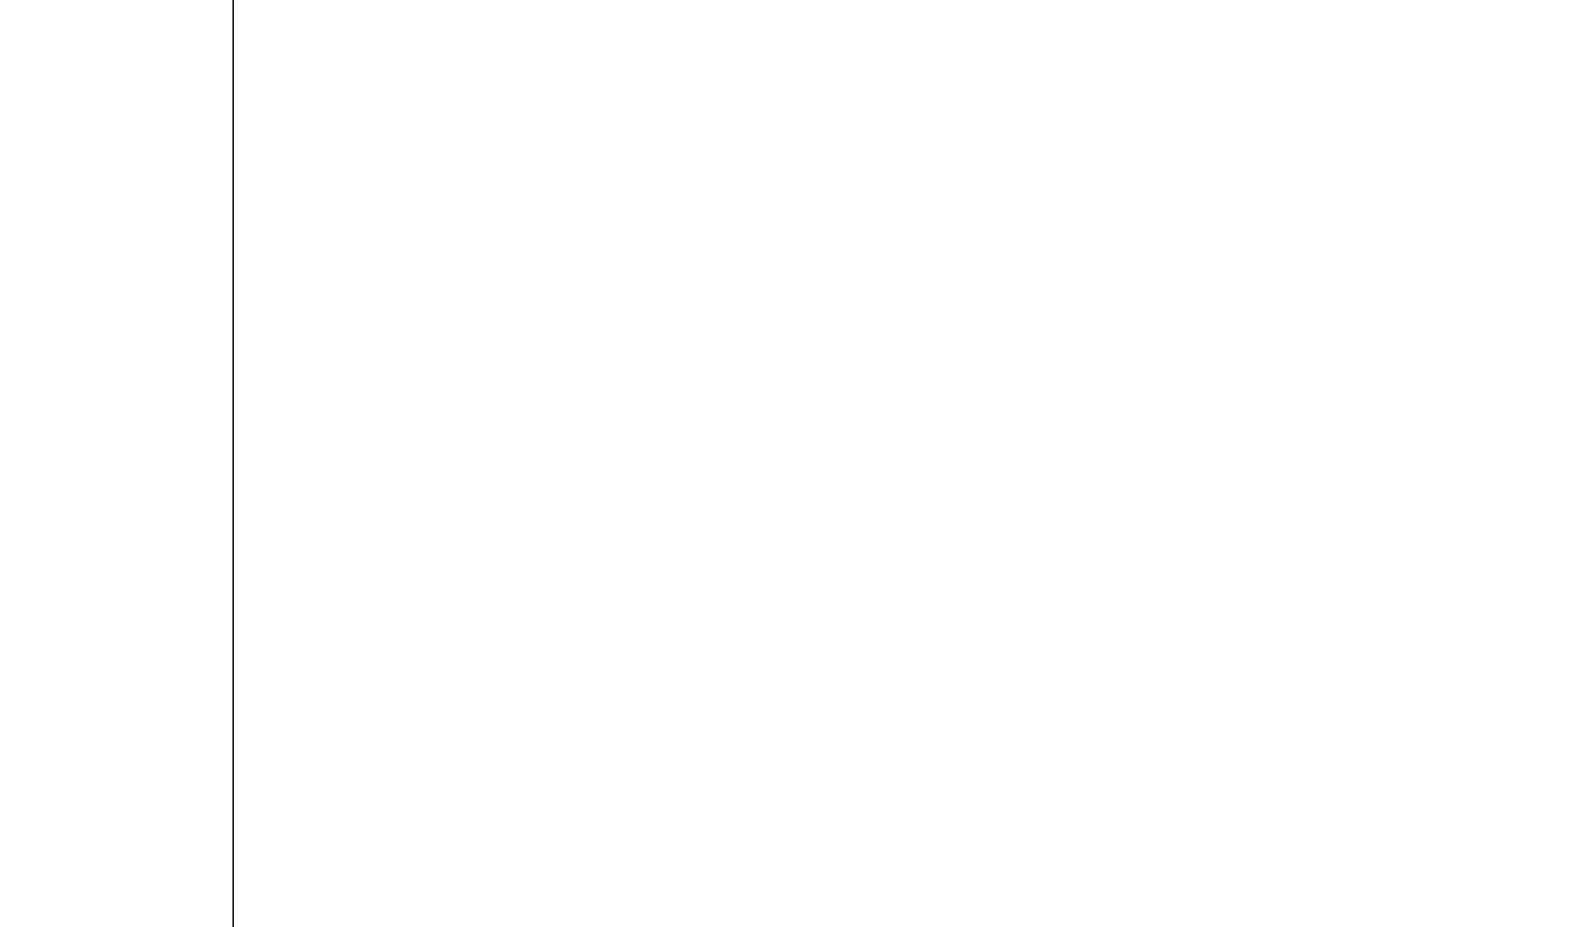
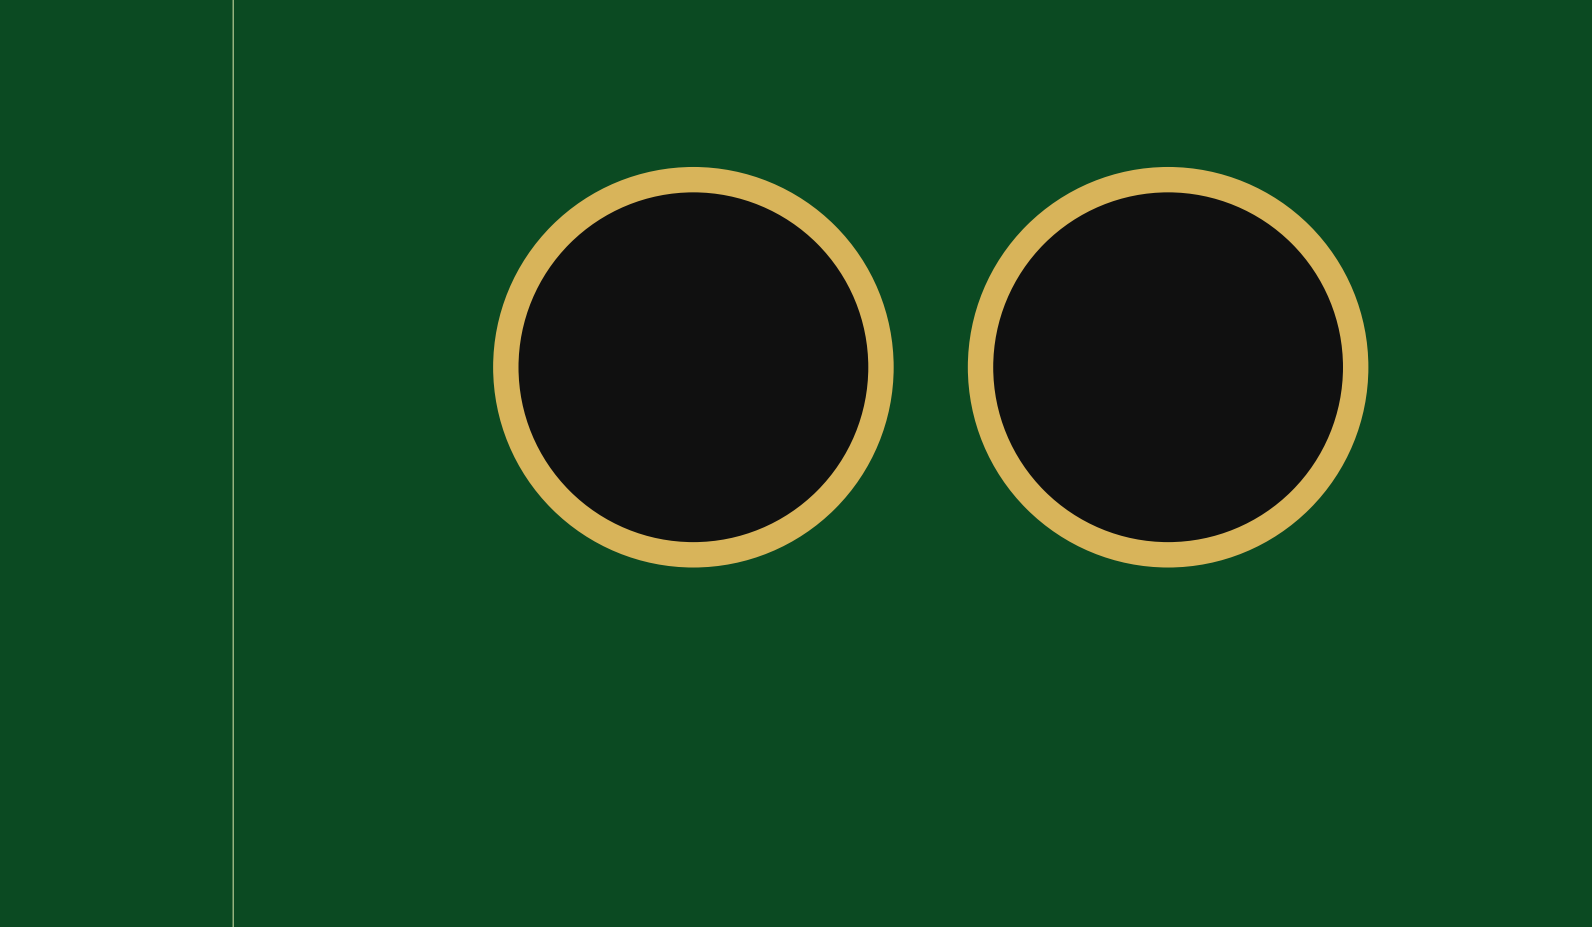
part: none -> (930, 367)

